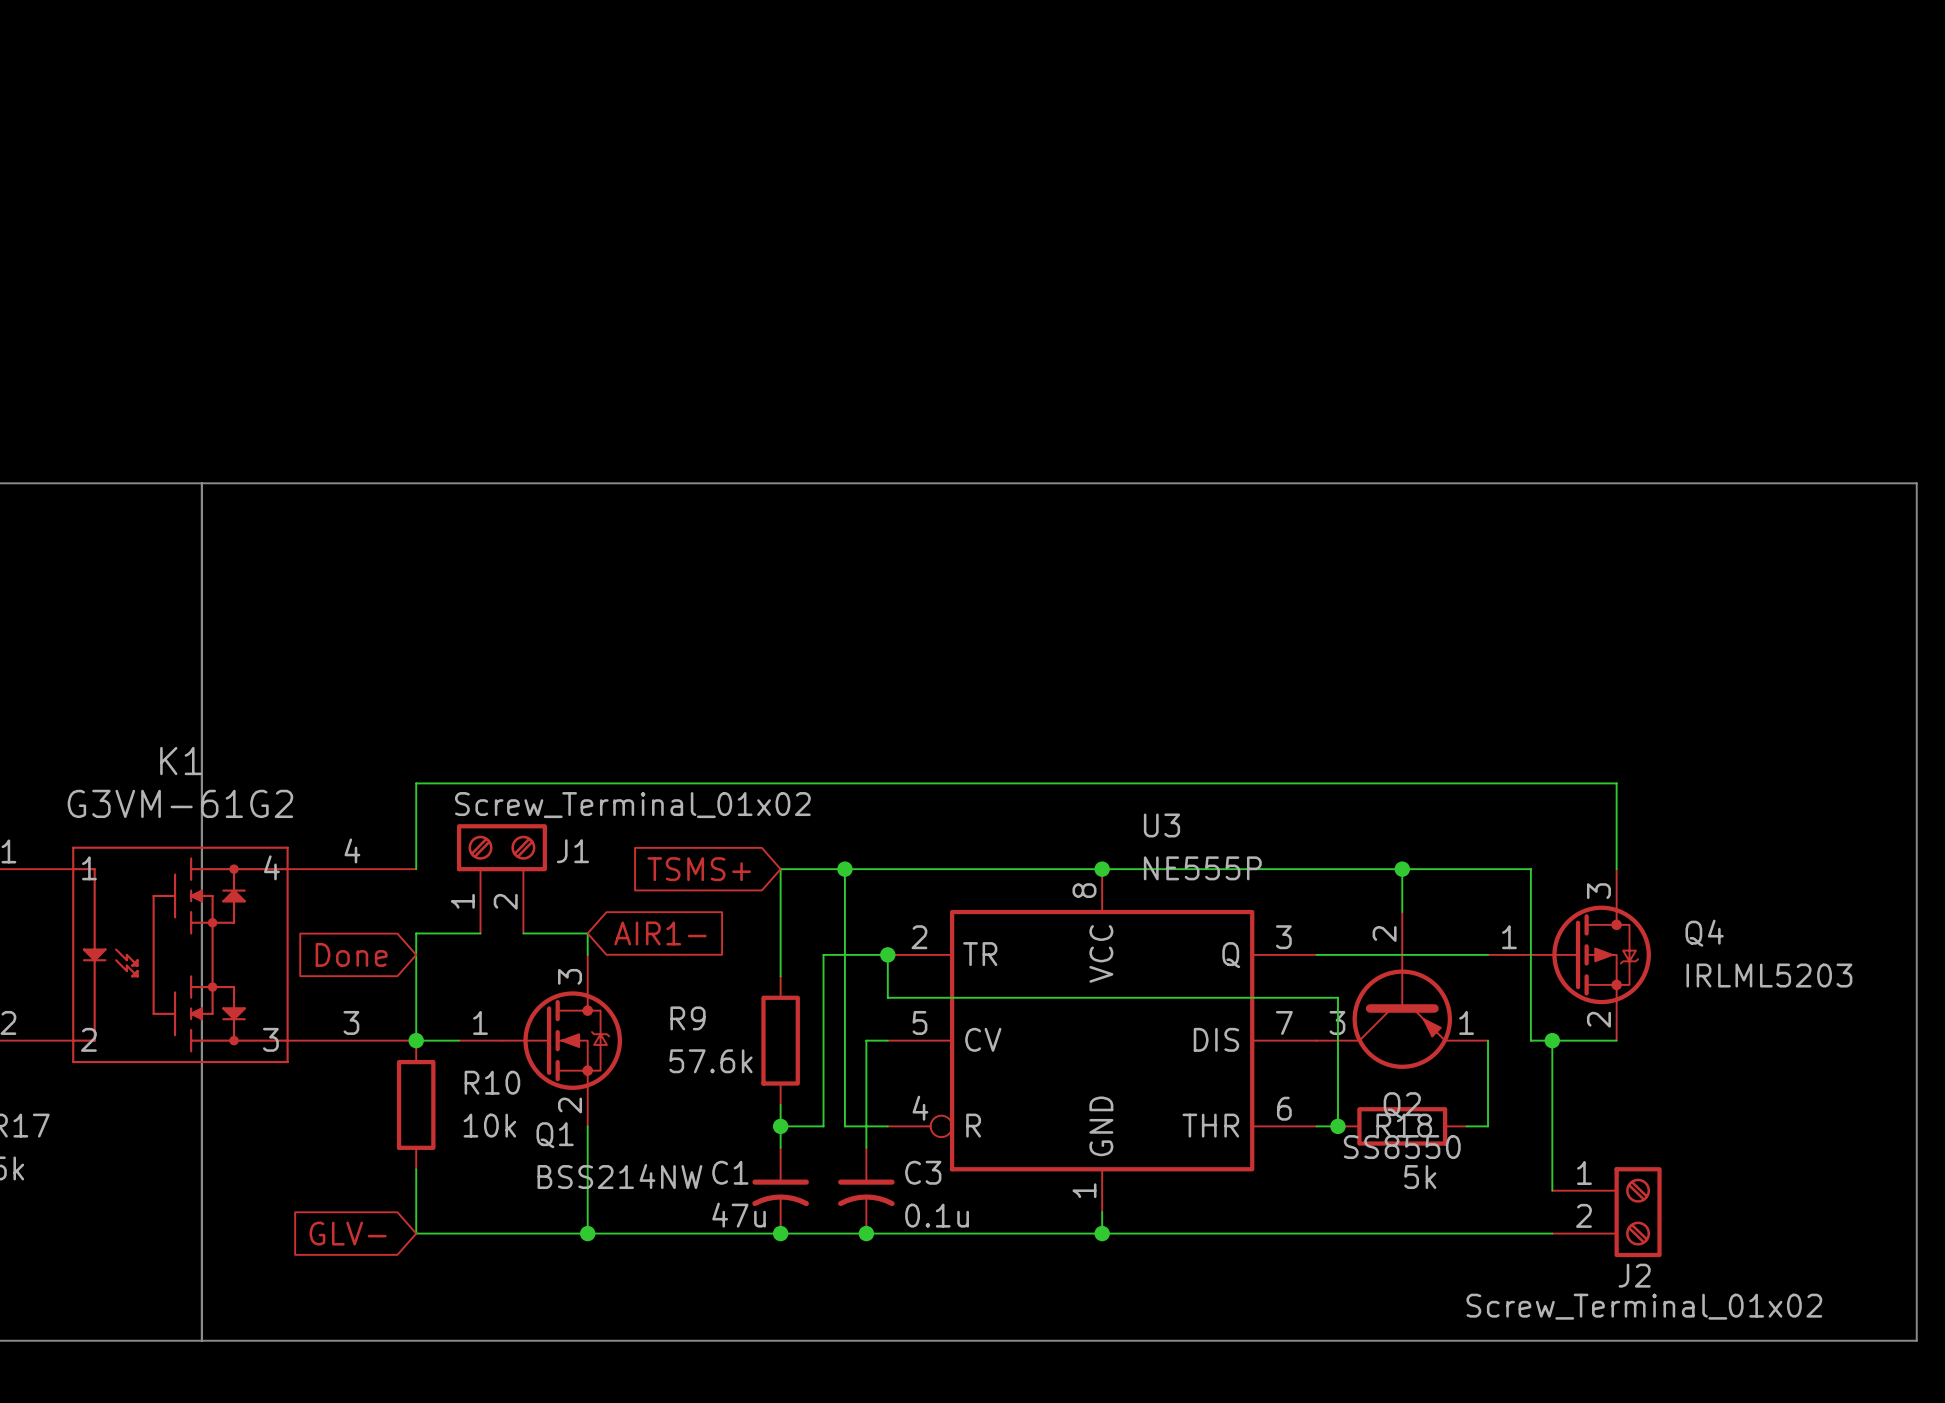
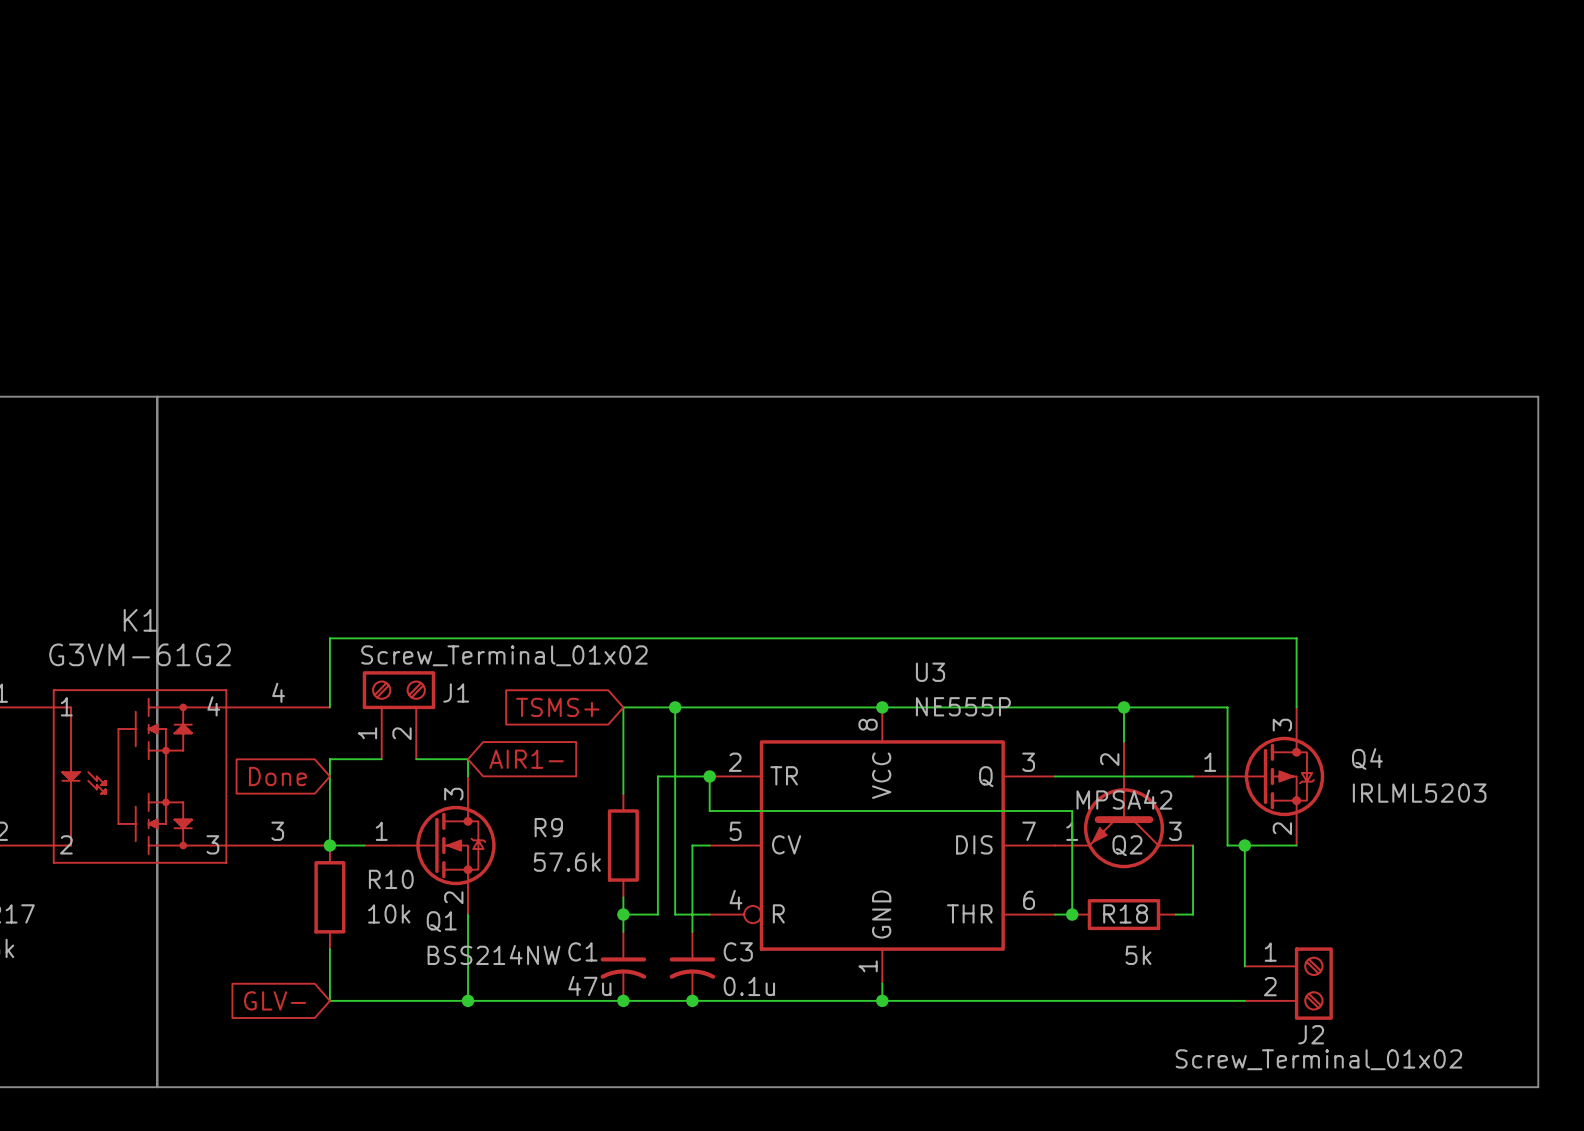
Q2 symbol: [1316, 912, 1489, 1069] -> [1054, 741, 1194, 869]
Q2 name position: Q2 (1402, 1105) -> Q2 (1127, 845)
Q2 value: SS8550 (1402, 1147) -> MPSA42 (1124, 799)

